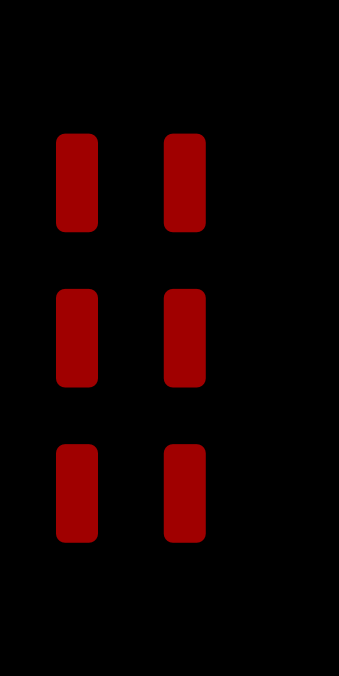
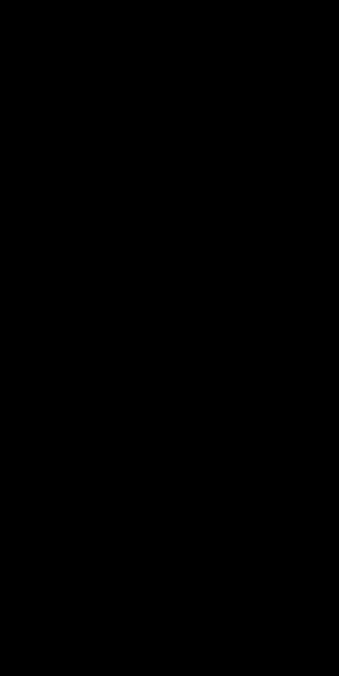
part: (130, 182) -> none
part: (130, 338) -> none
part: (130, 493) -> none

